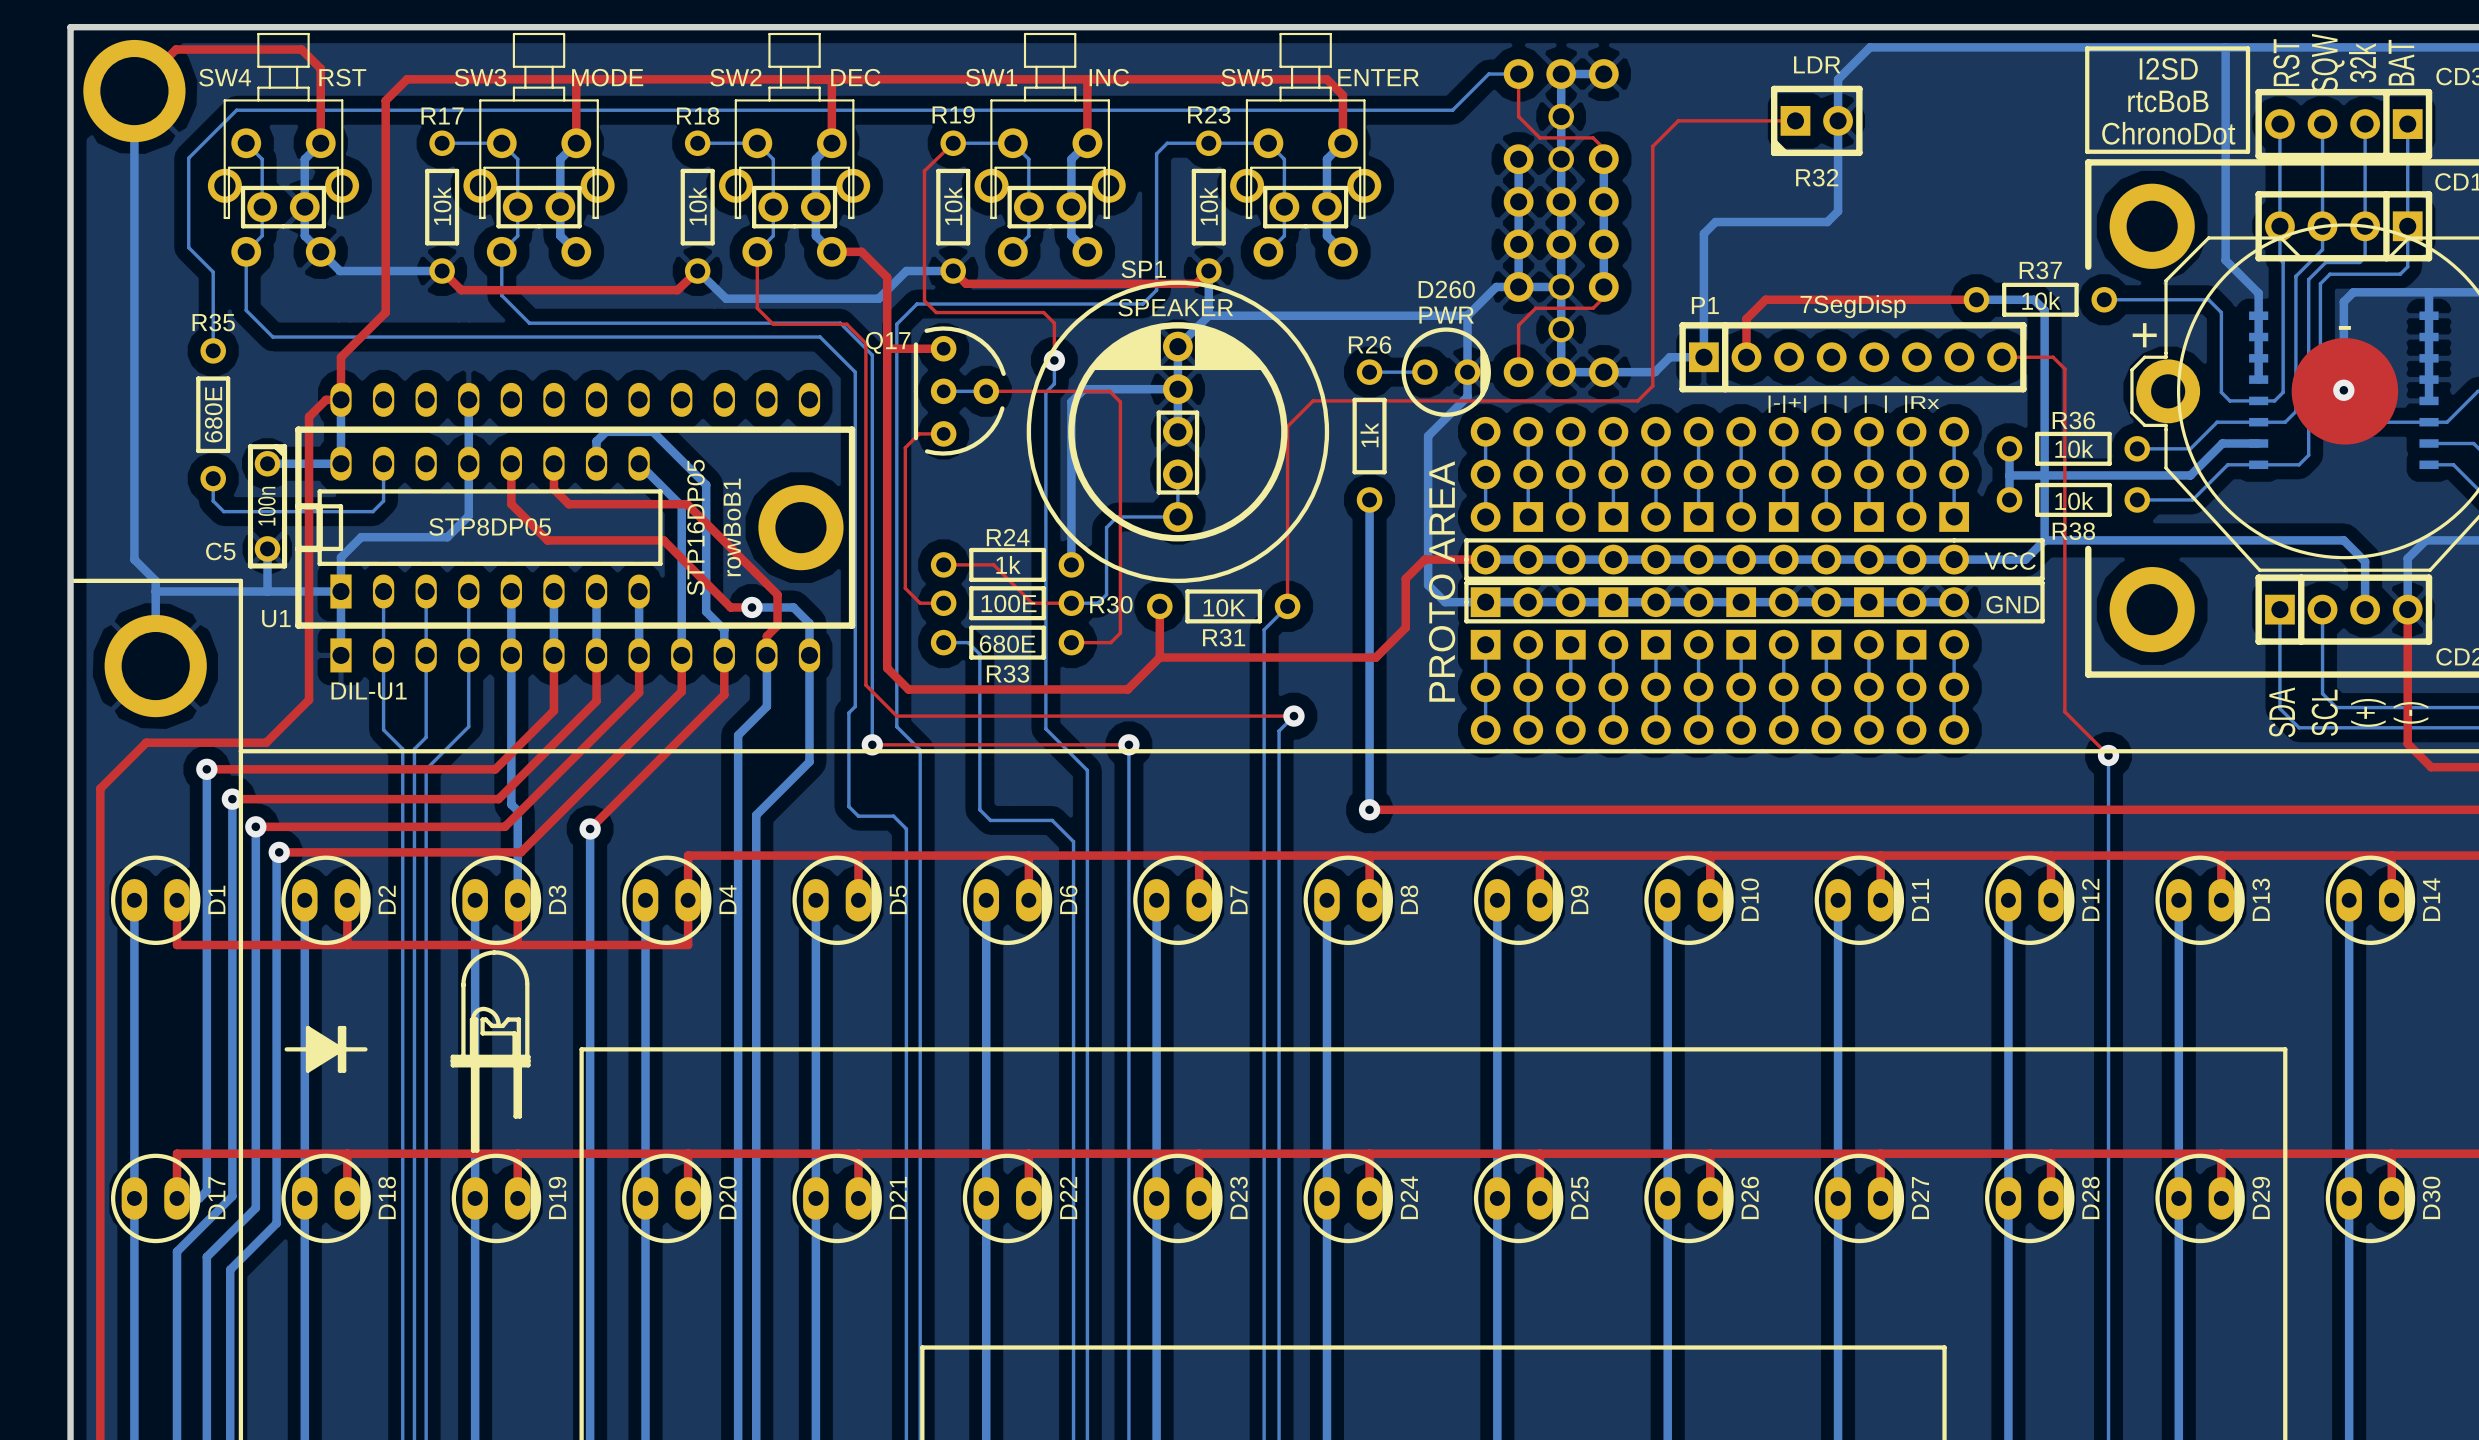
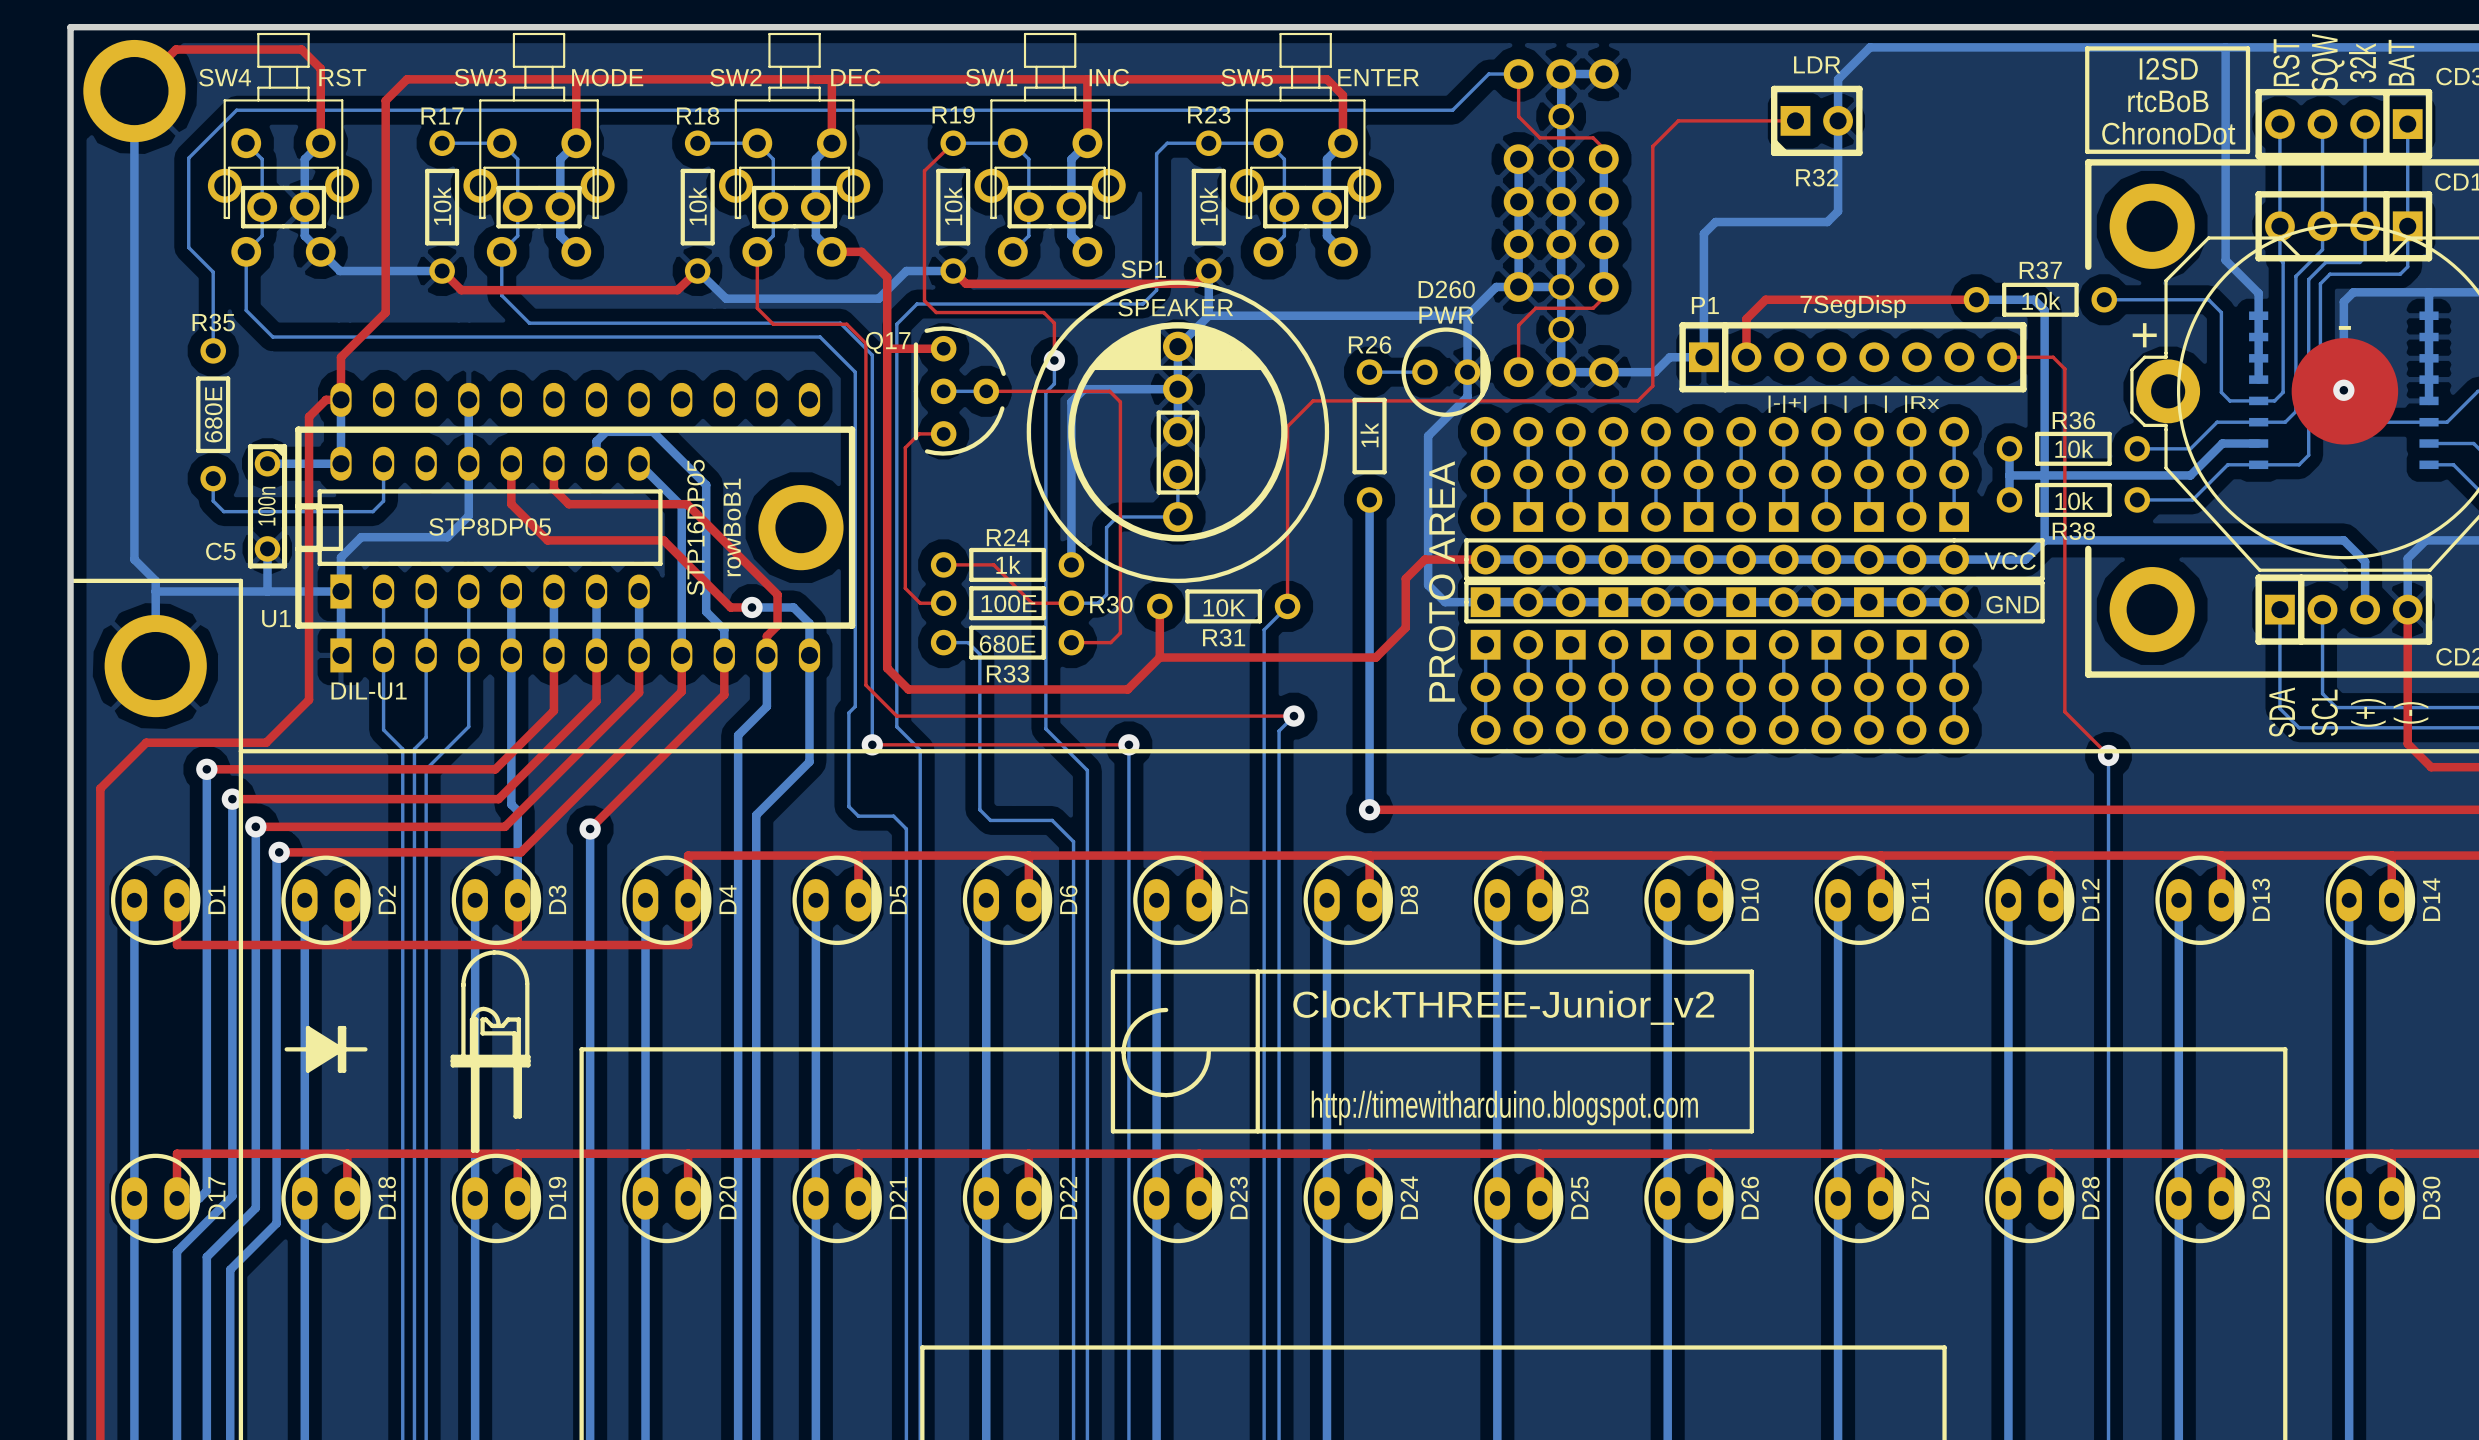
line: none -> (1112, 971) (1112, 1131) (1751, 1131) (1751, 971) (1112, 971)
line: none -> (1257, 971) (1257, 1131)
text: none -> ClockTHREE-Junior_v2 (1503, 1007)
line: none -> (1166, 1009) (1155, 1011) (1140, 1018) (1126, 1036) (1123, 1052) (1125, 1063) (1136, 1082) (1155, 1093) (1166, 1095) (1182, 1091) (1199, 1078) (1207, 1063) (1208, 1052)
text: none -> http://timewitharduino.blogspot.com (1504, 1108)

